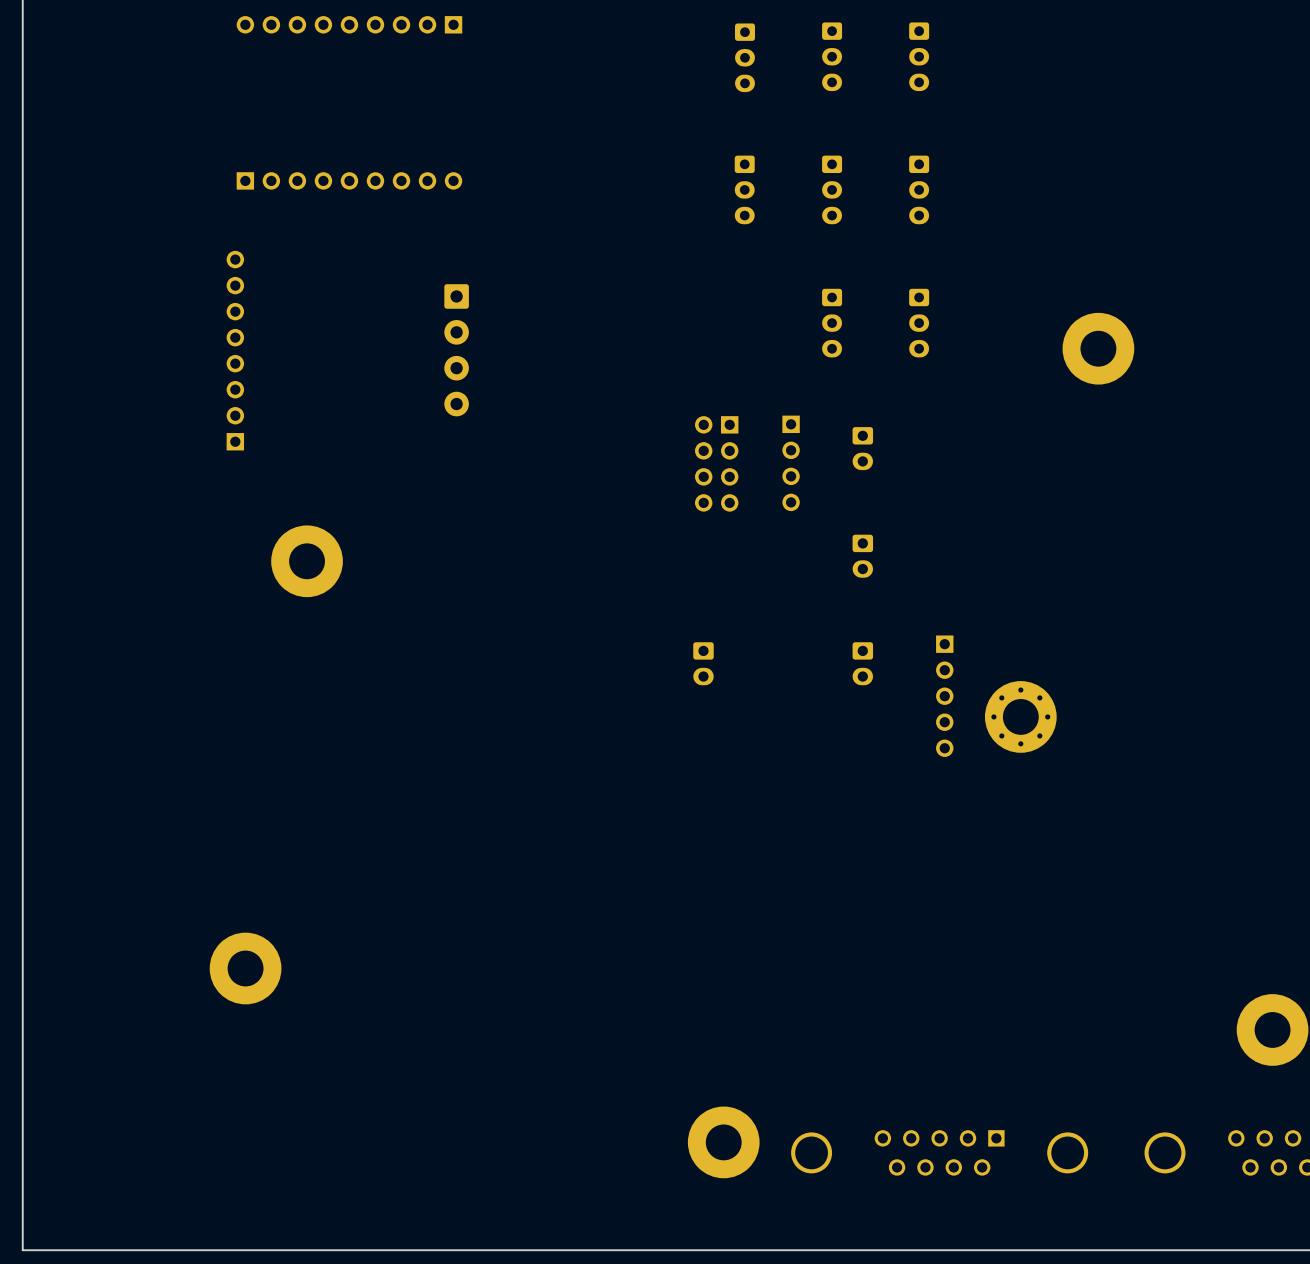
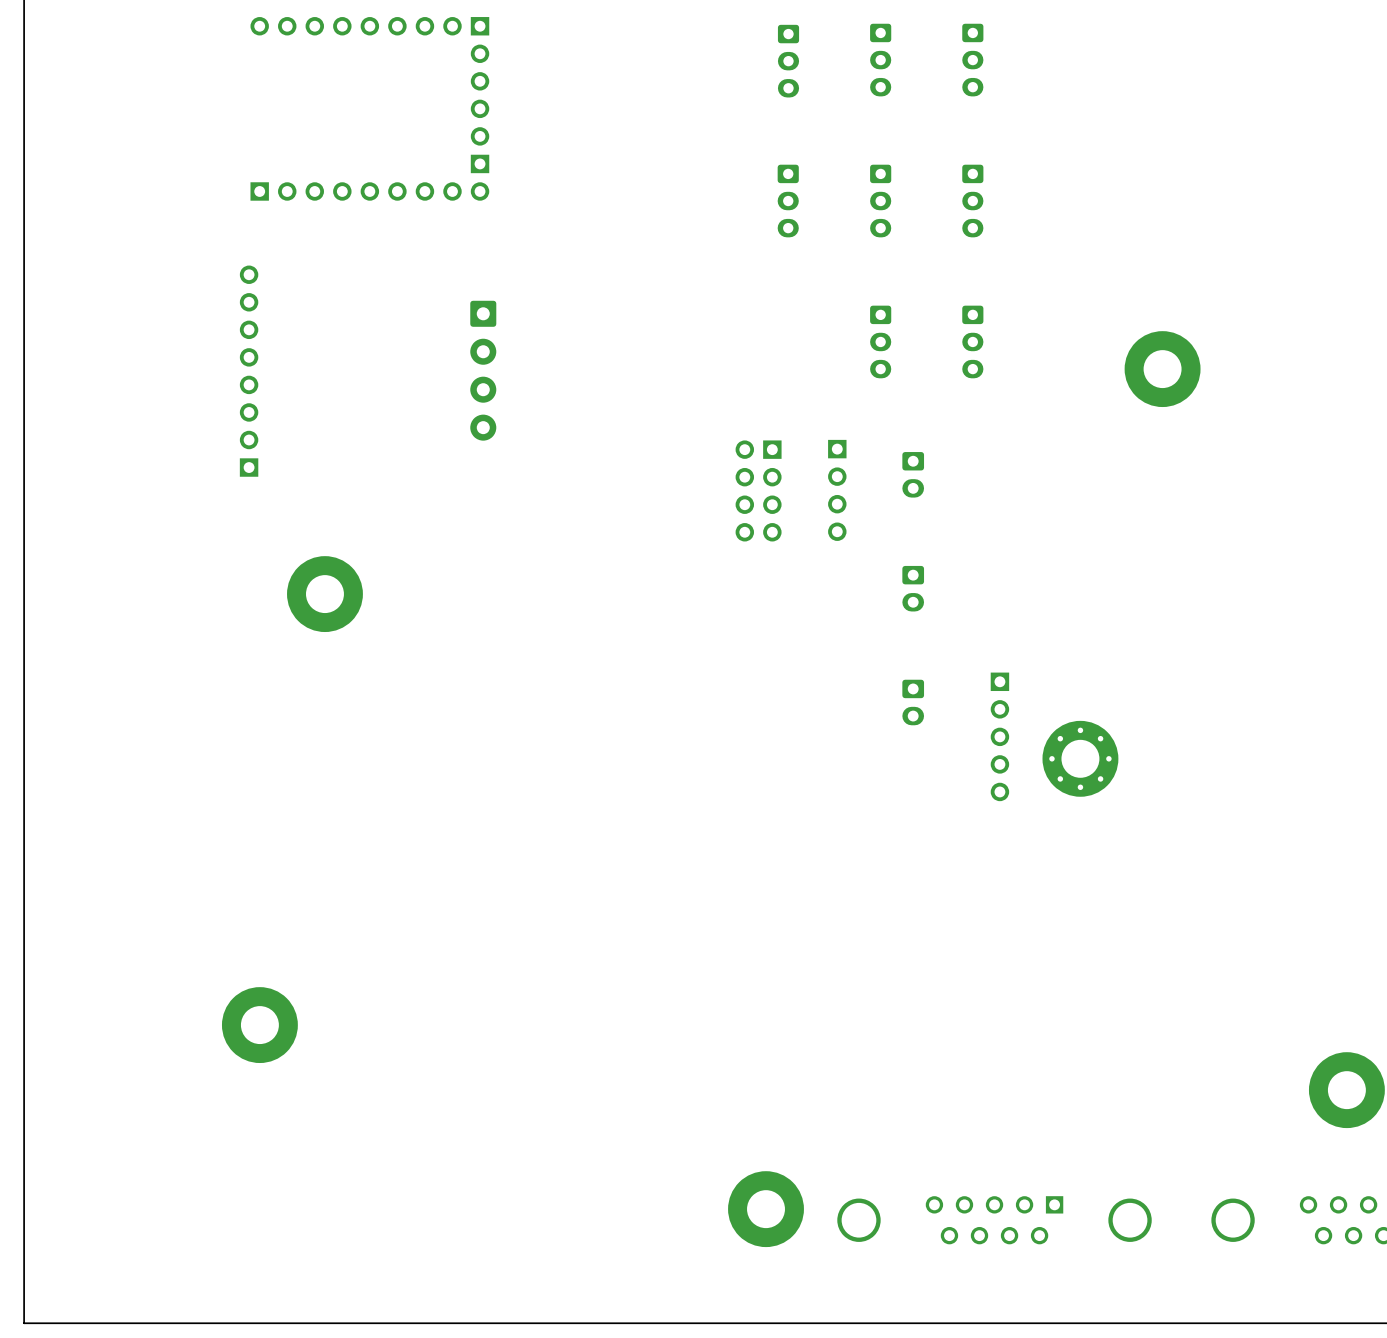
part: none -> (480, 108)
part: (703, 663) -> none

